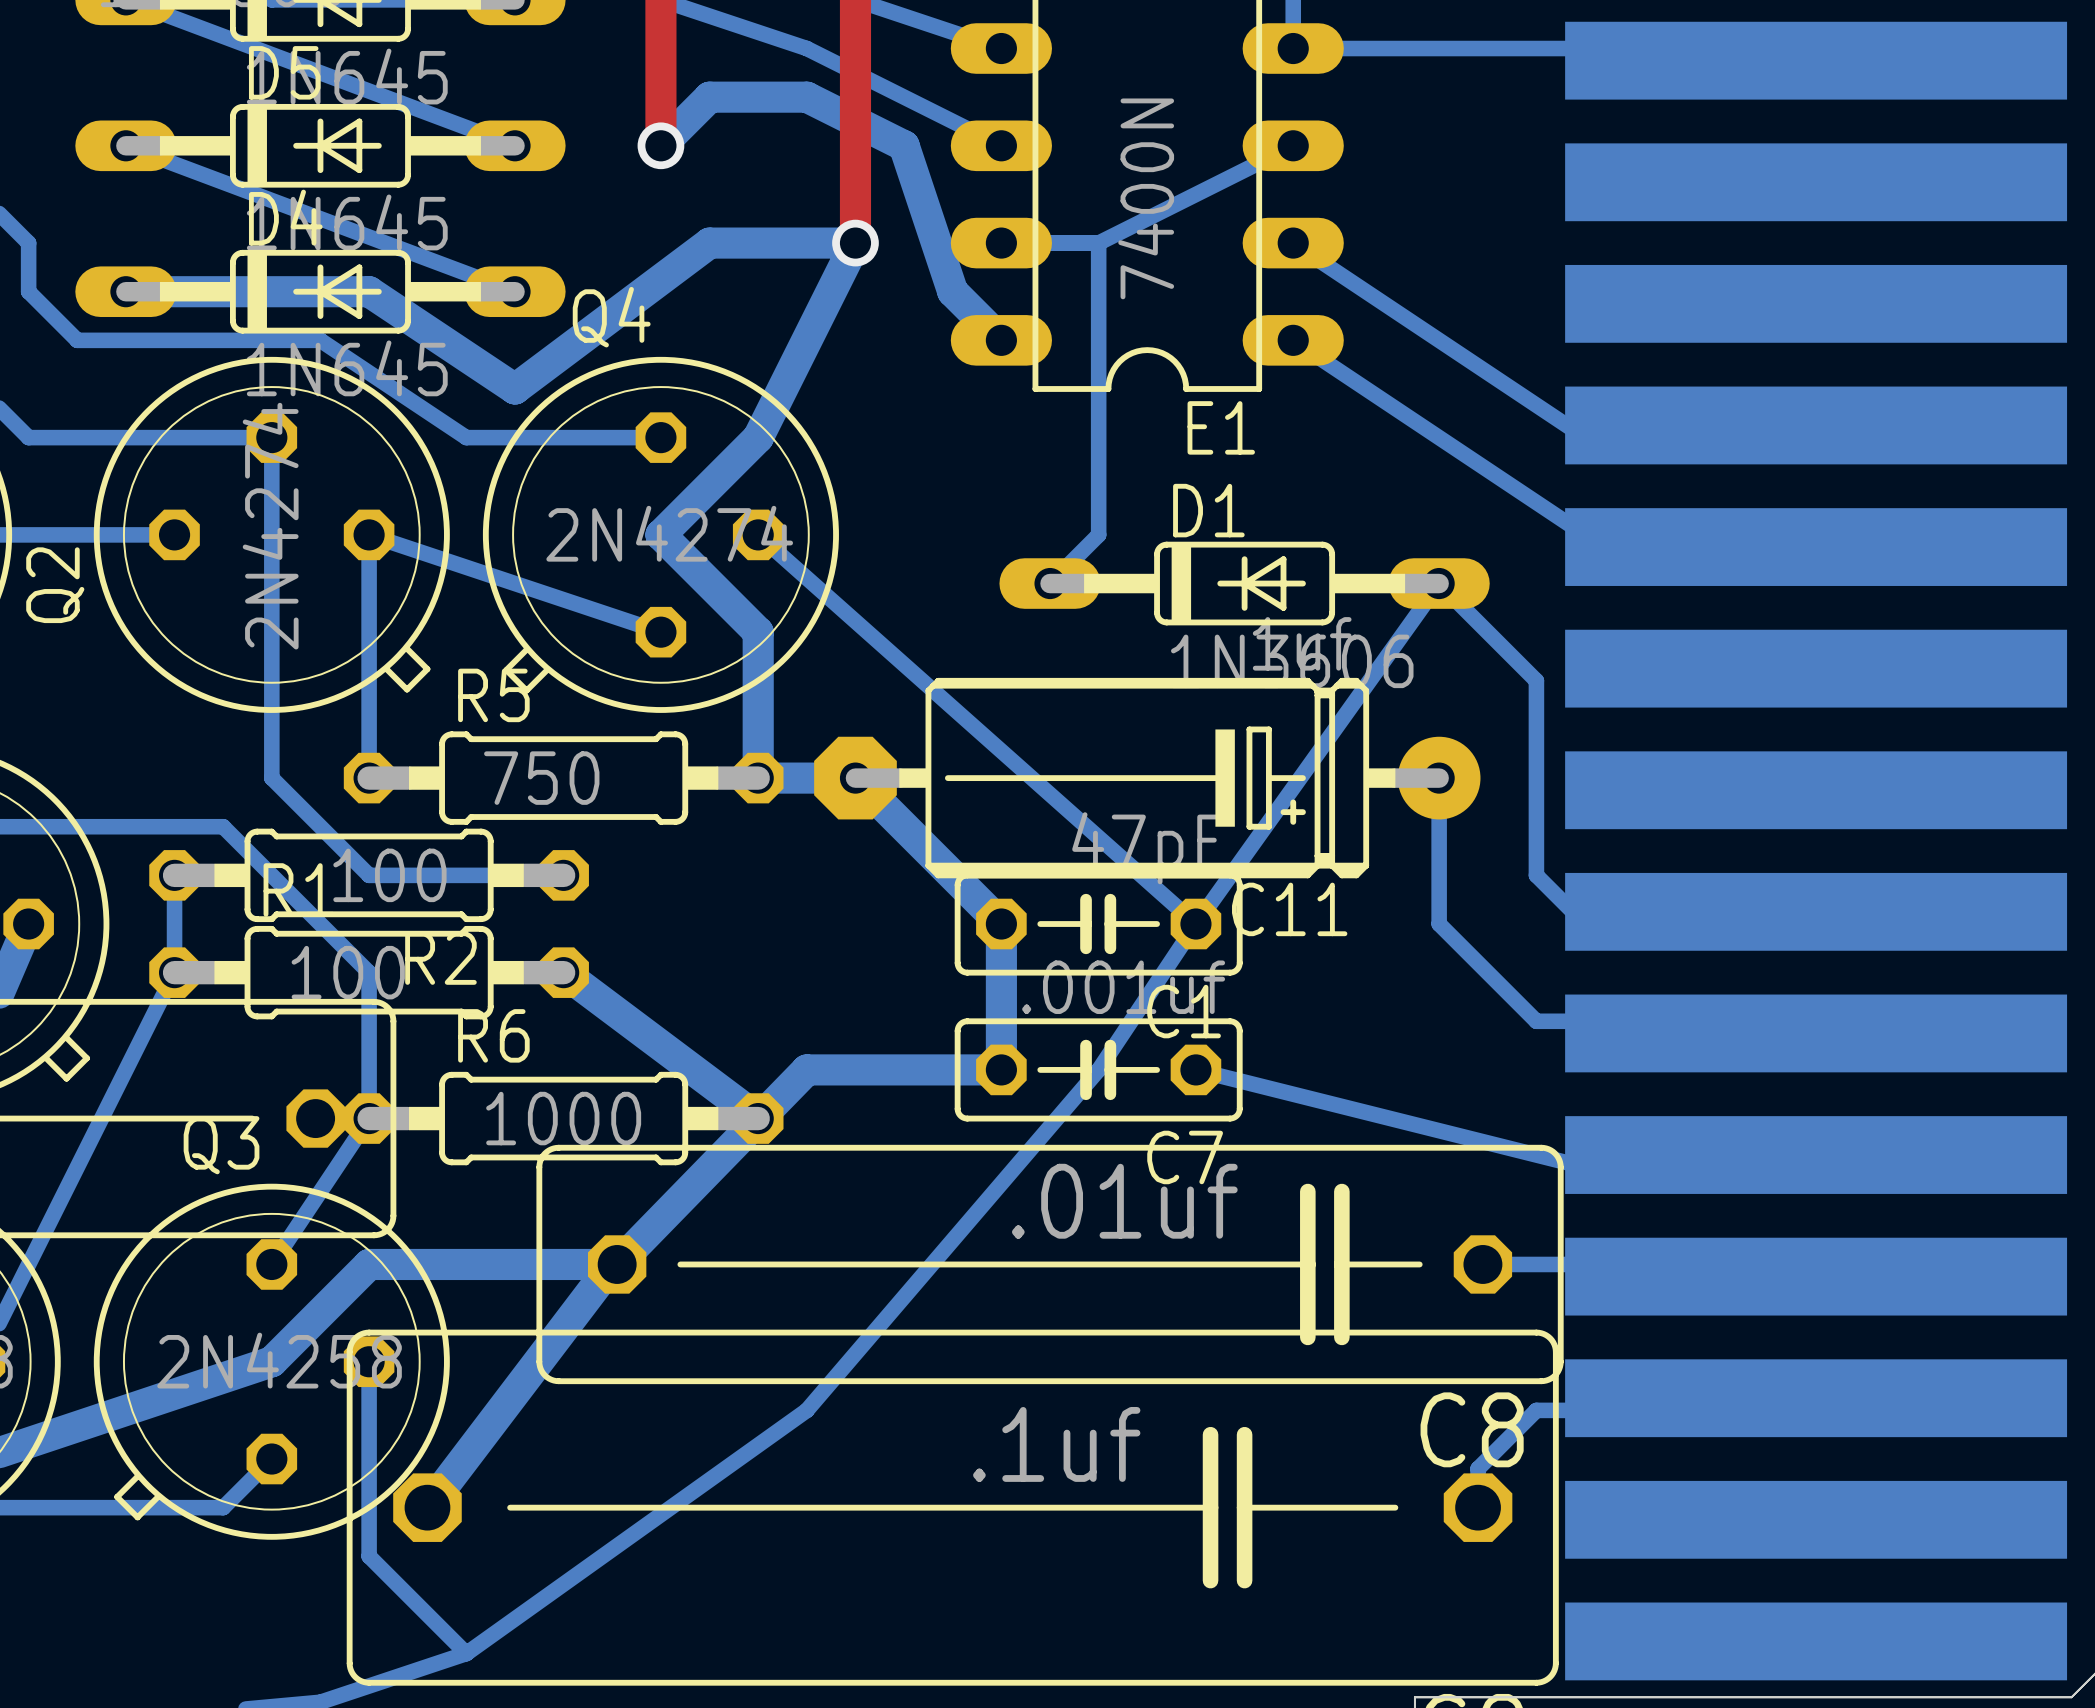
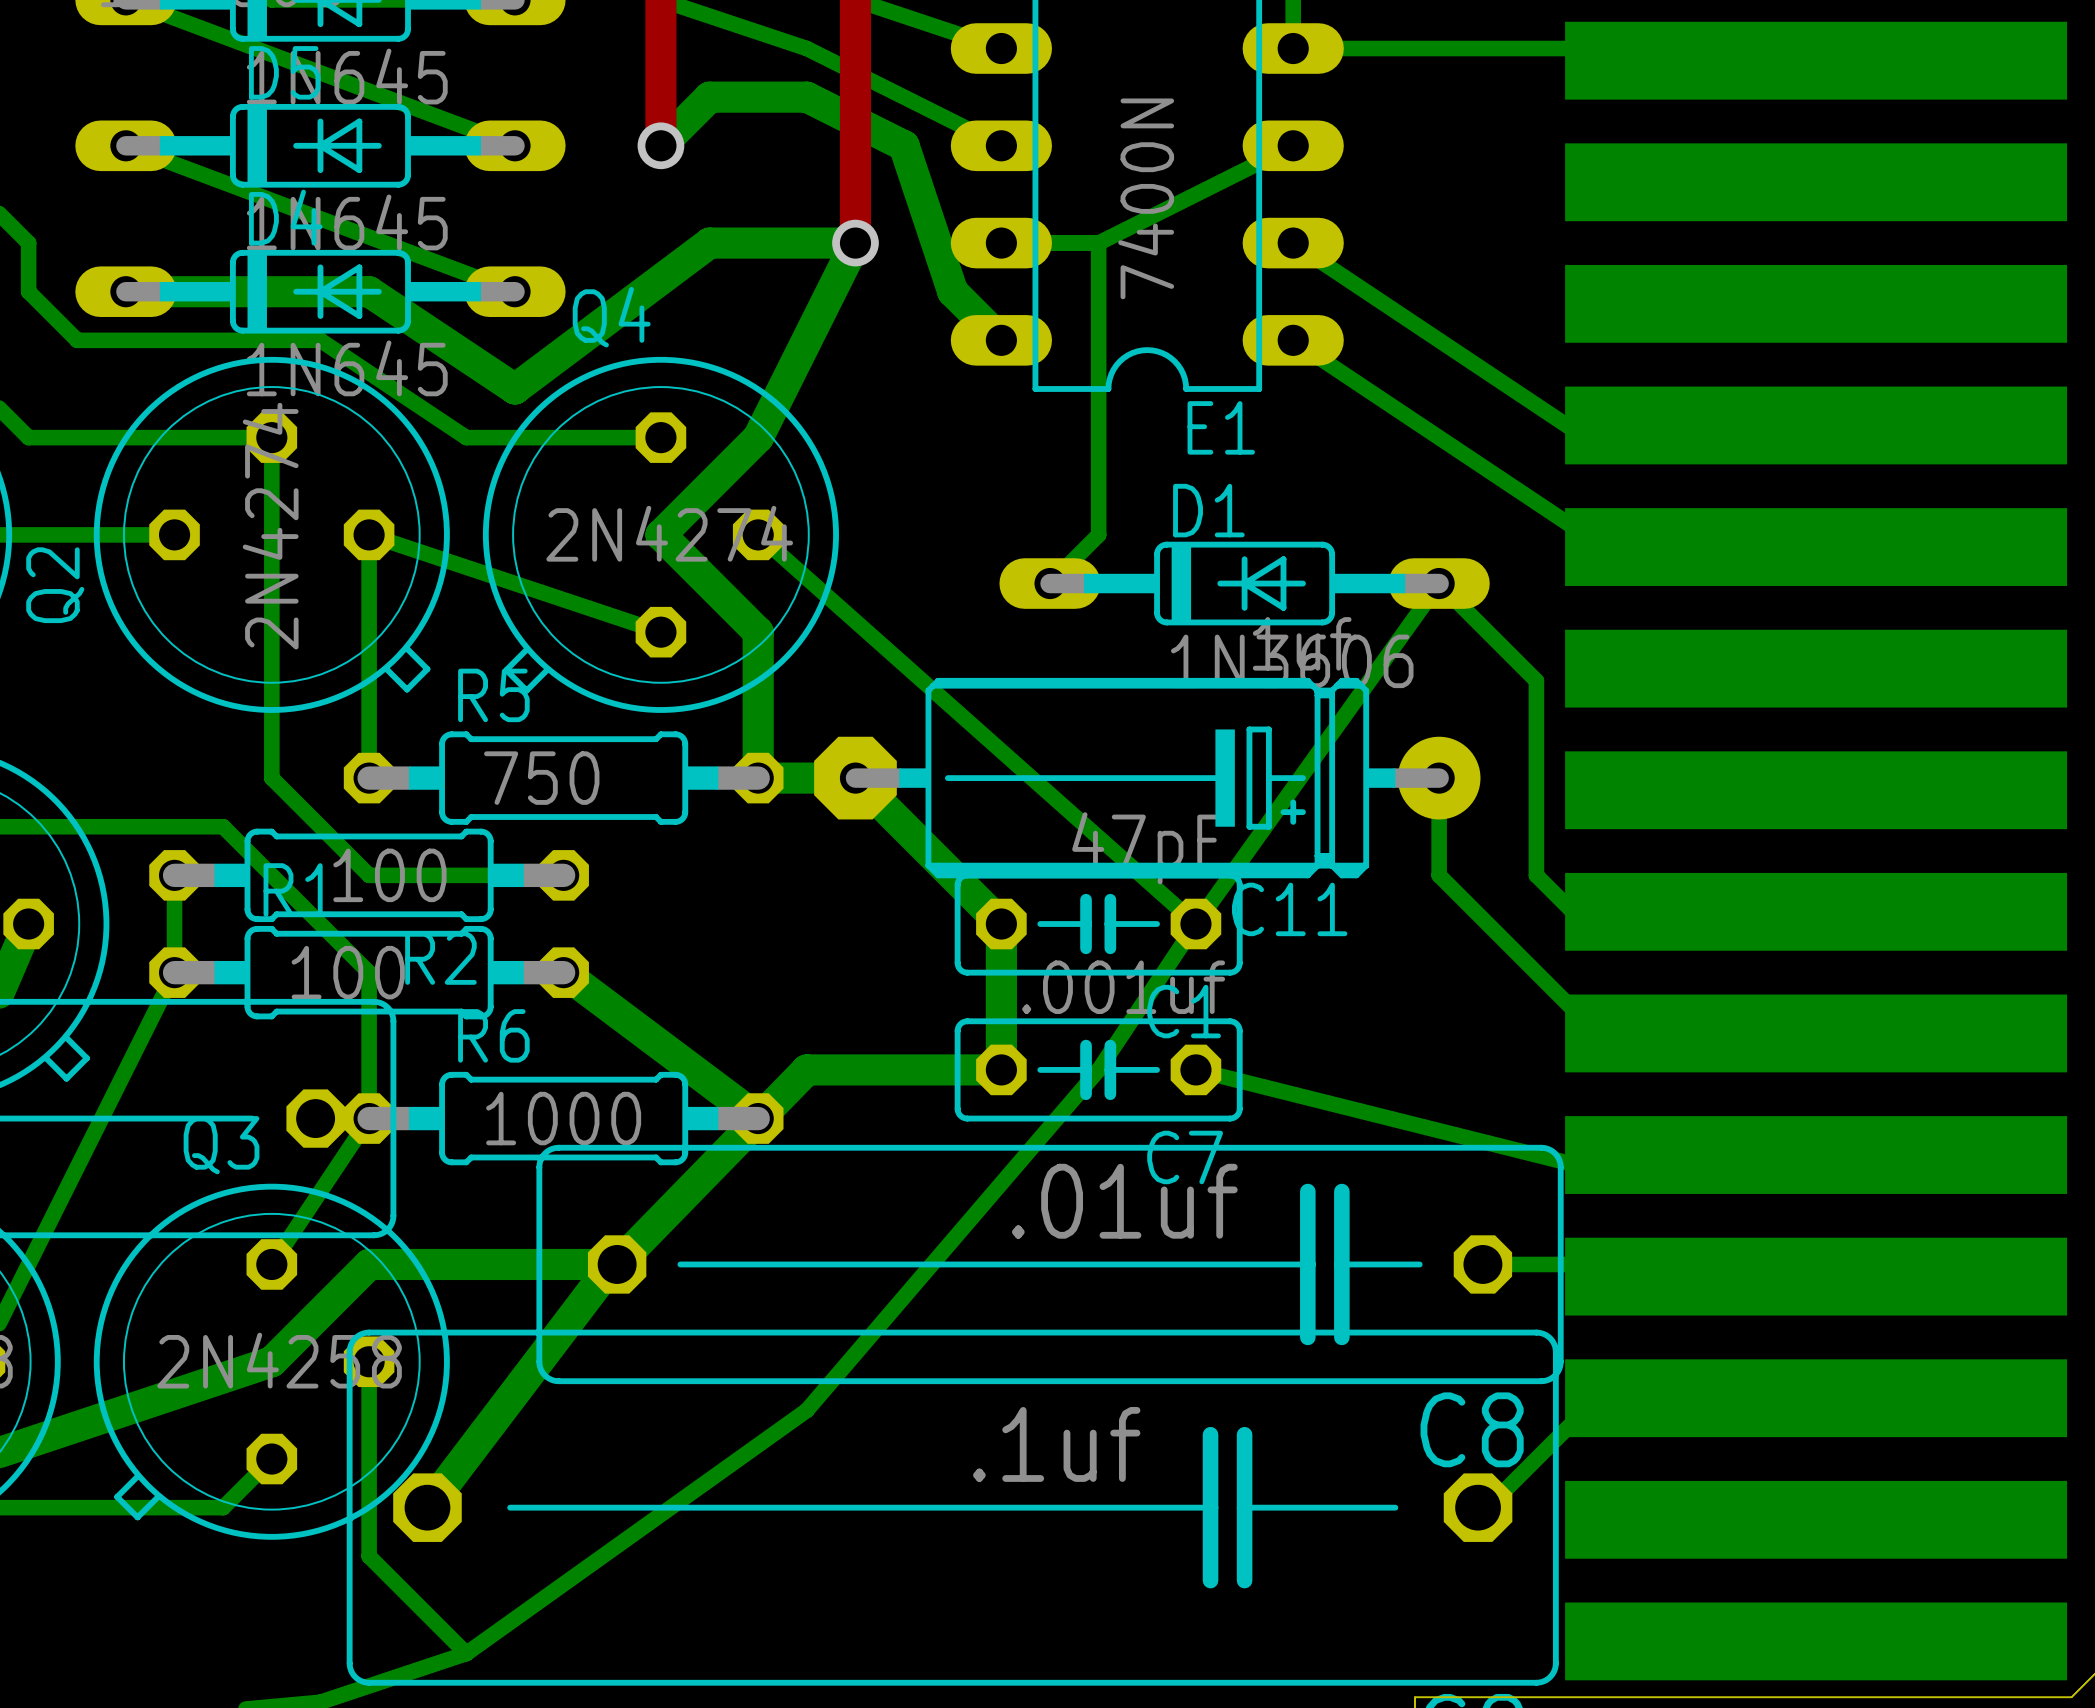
bottom track: (1439, 875) (1439, 924) (1536, 1021) (1585, 1021) -> (1439, 875) (1585, 1021)
bottom track: (1585, 1410) (1536, 1410) (1478, 1468) (1478, 1507) -> (1585, 1410) (1487, 1507) (1478, 1507)

